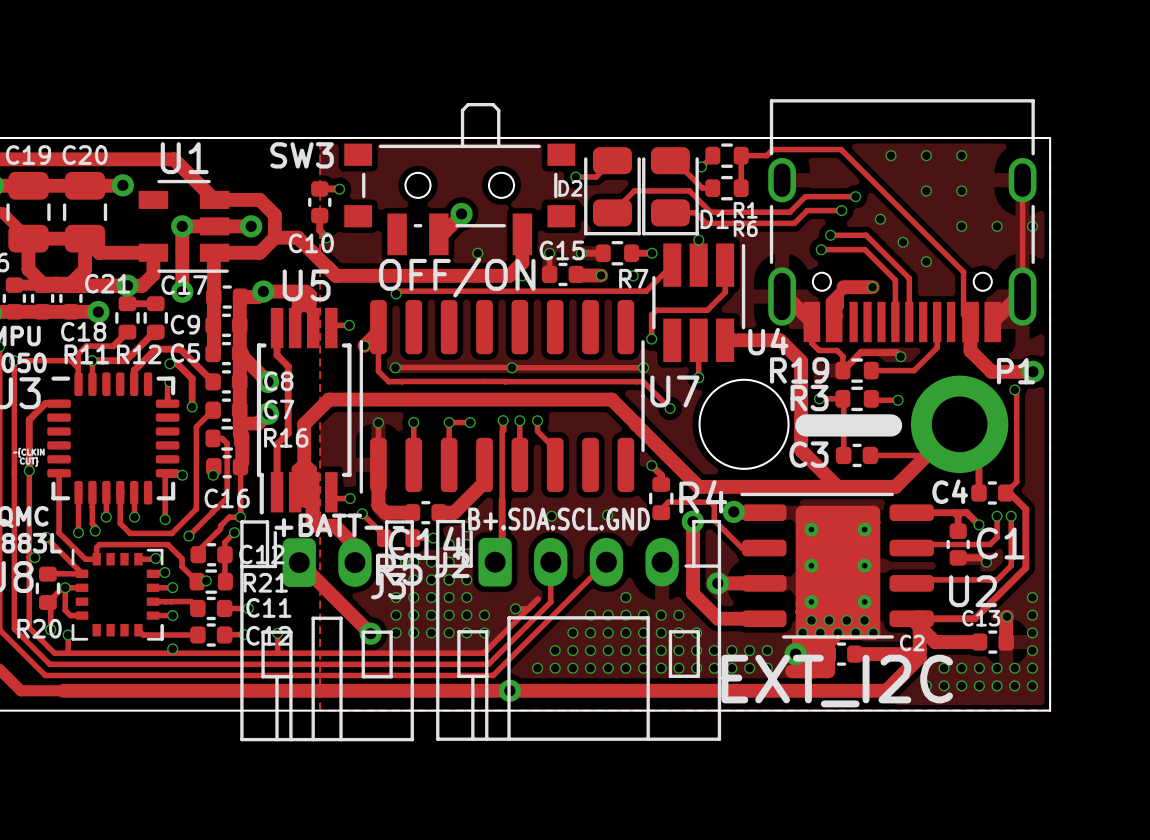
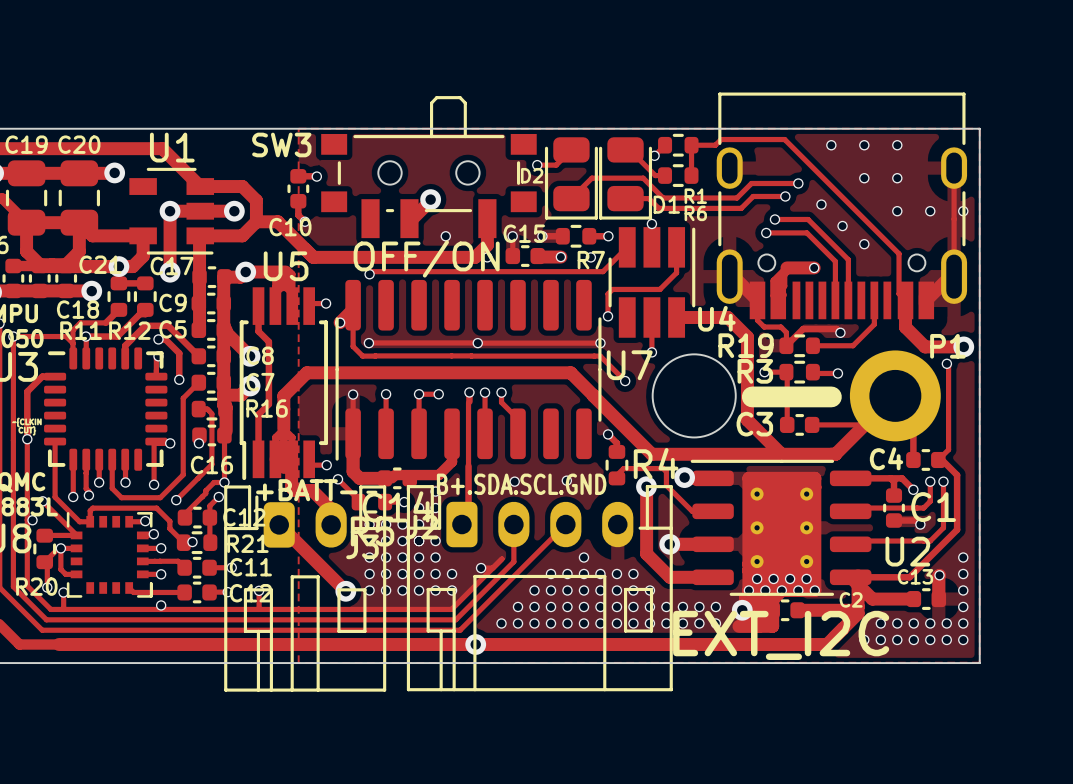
track: none -> (452, 433) (452, 461) (438, 475) (395, 475) (391, 478)
track: (484, 482) (454, 512) (439, 512) -> none

